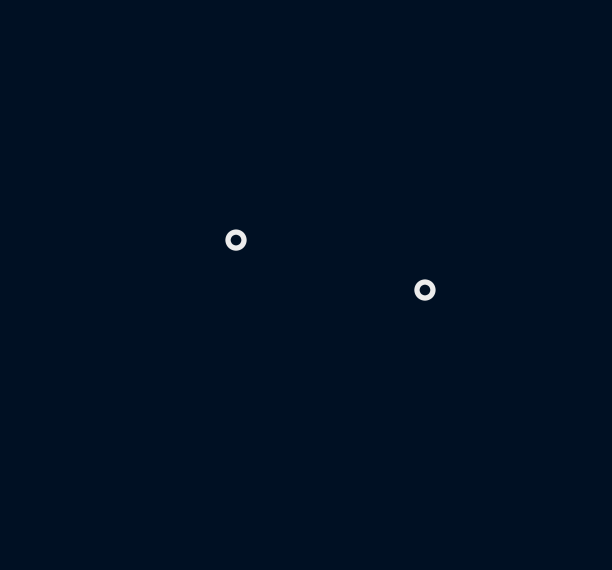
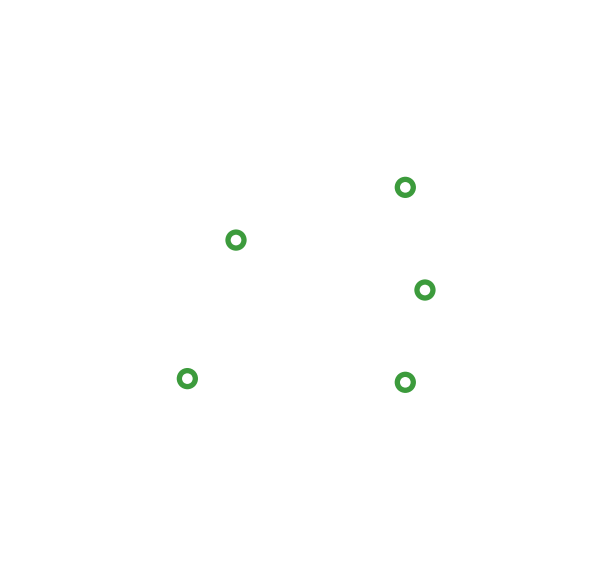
via: none -> (405, 187)
via: none -> (187, 378)
via: none -> (405, 382)

